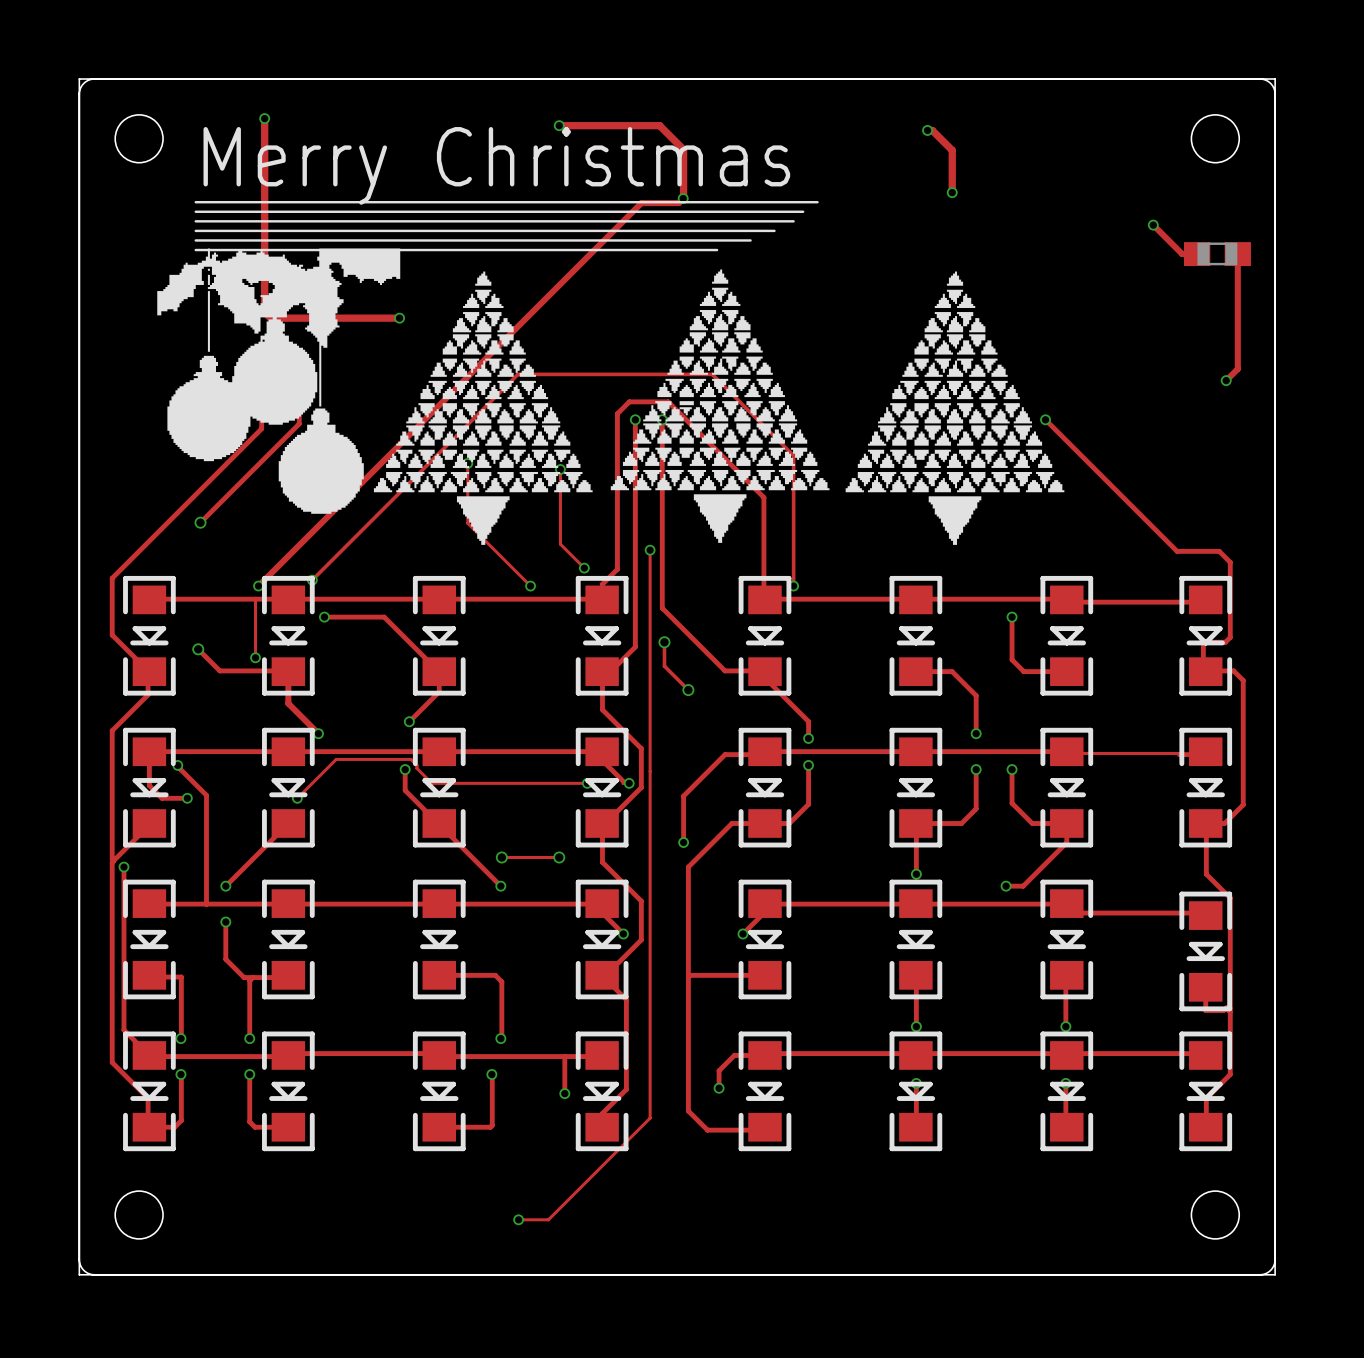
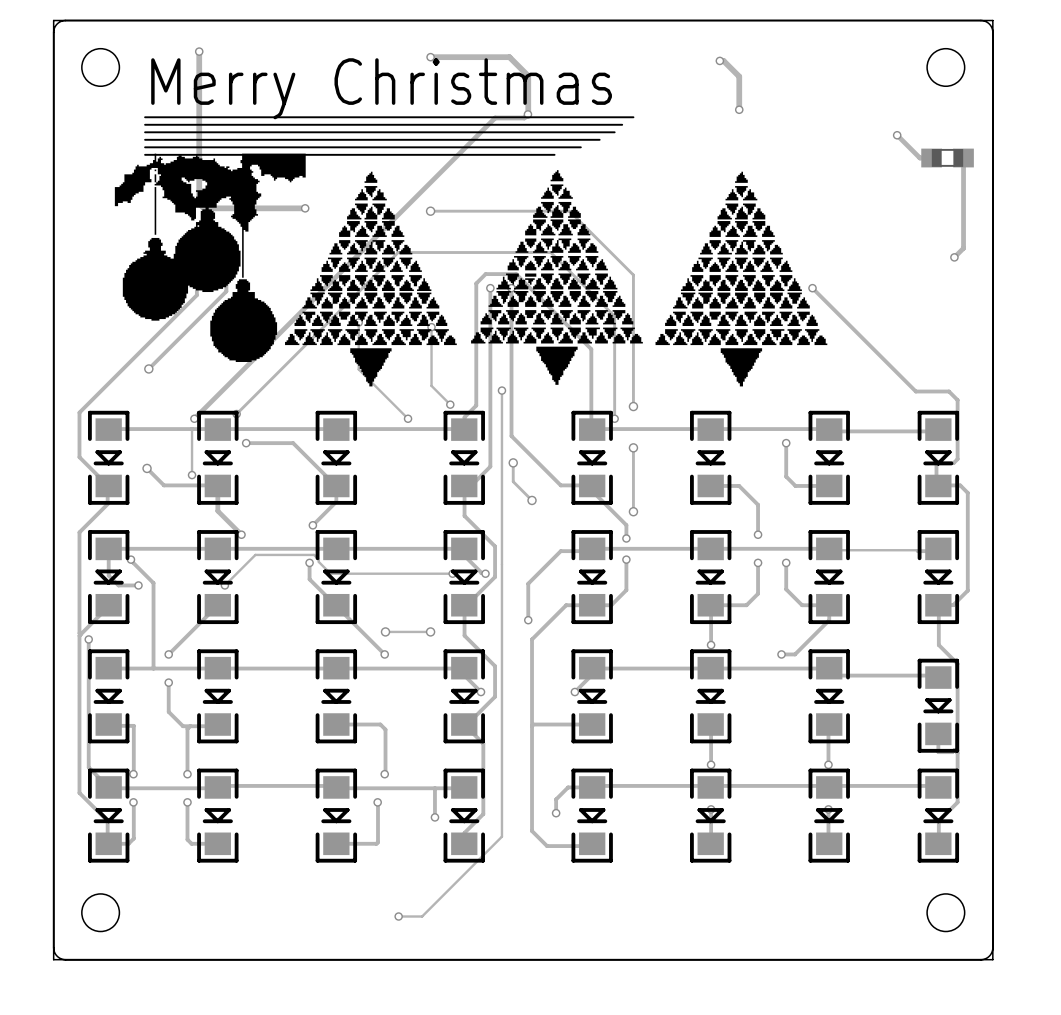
track: none -> (430, 211) (569, 211) (633, 275) (633, 406)
via: none -> (430, 211)
via: none -> (633, 406)
track: none -> (633, 447) (633, 511)
via: none -> (633, 447)
via: none -> (633, 511)

